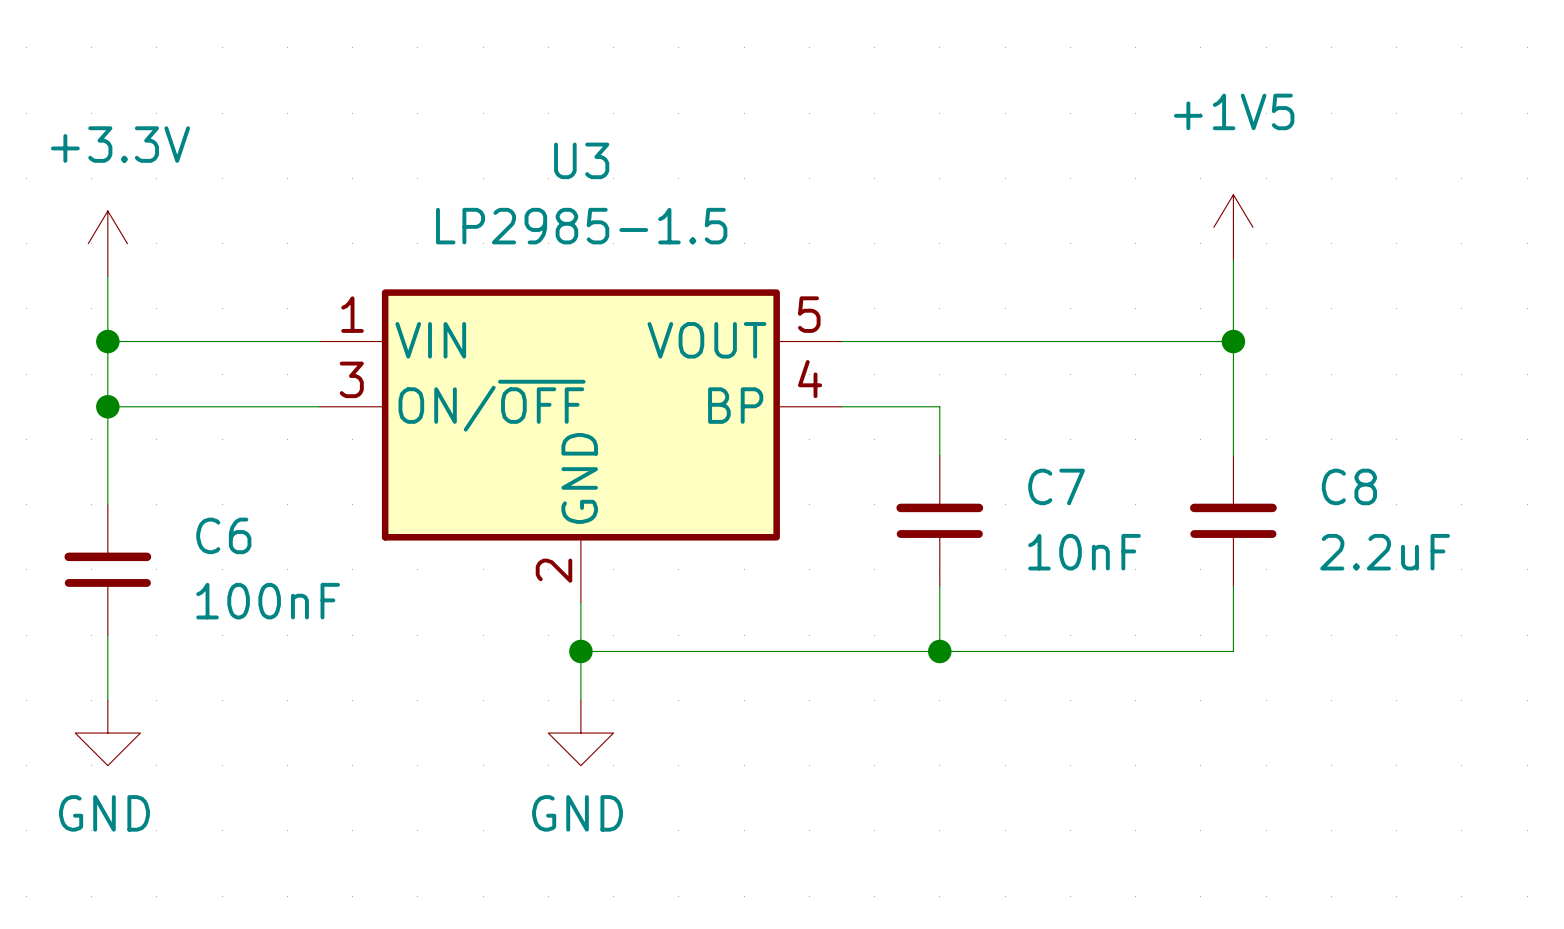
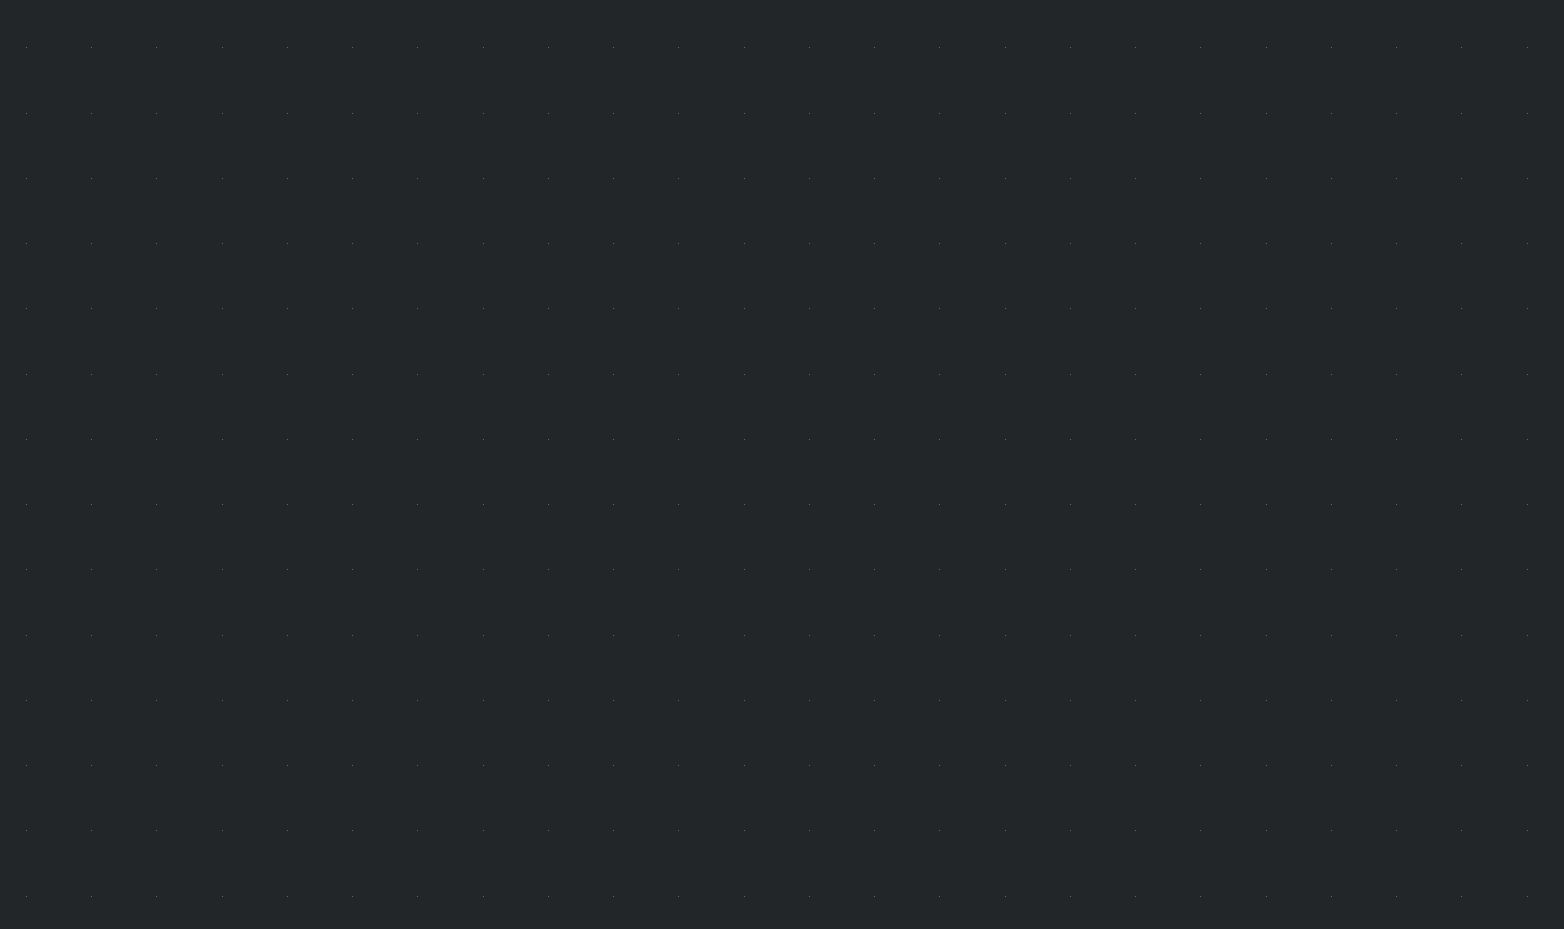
power symbol: +1V5 (1233, 227) -> none
power symbol: +3.3V (107, 243) -> none
wire: (1233, 259) (1233, 455) -> none
wire: (107, 276) (107, 504) -> none
wire: (107, 341) (319, 341) -> none
junction: (107, 341) -> none
wire: (841, 341) (1233, 341) -> none
junction: (1233, 341) -> none
wire: (107, 406) (319, 406) -> none
junction: (107, 406) -> none
wire: (841, 406) (939, 406) (939, 455) -> none
U3: LP2985-1.5 (580, 445) -> none
C7: 10nF (939, 520) -> none
C8: 2.2uF (1233, 520) -> none
C6: 100nF (107, 569) -> none
wire: (939, 586) (939, 651) -> none
wire: (1233, 586) (1233, 651) (580, 651) -> none
wire: (580, 602) (580, 700) -> none
wire: (107, 635) (107, 700) -> none
junction: (580, 651) -> none
junction: (939, 651) -> none
power symbol: GND (107, 733) -> none
power symbol: GND (580, 733) -> none

